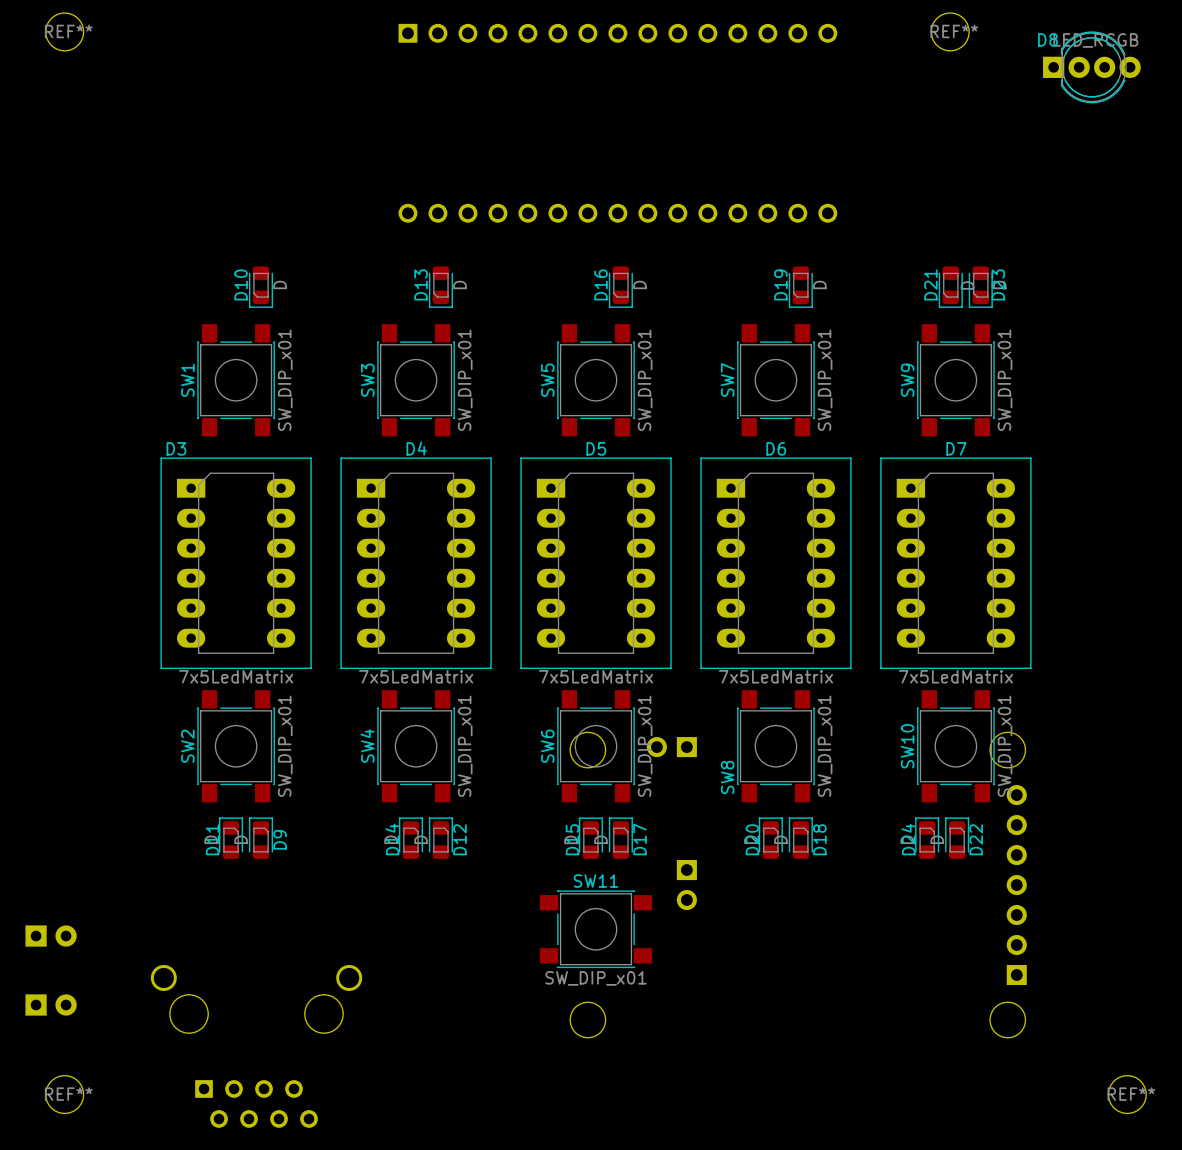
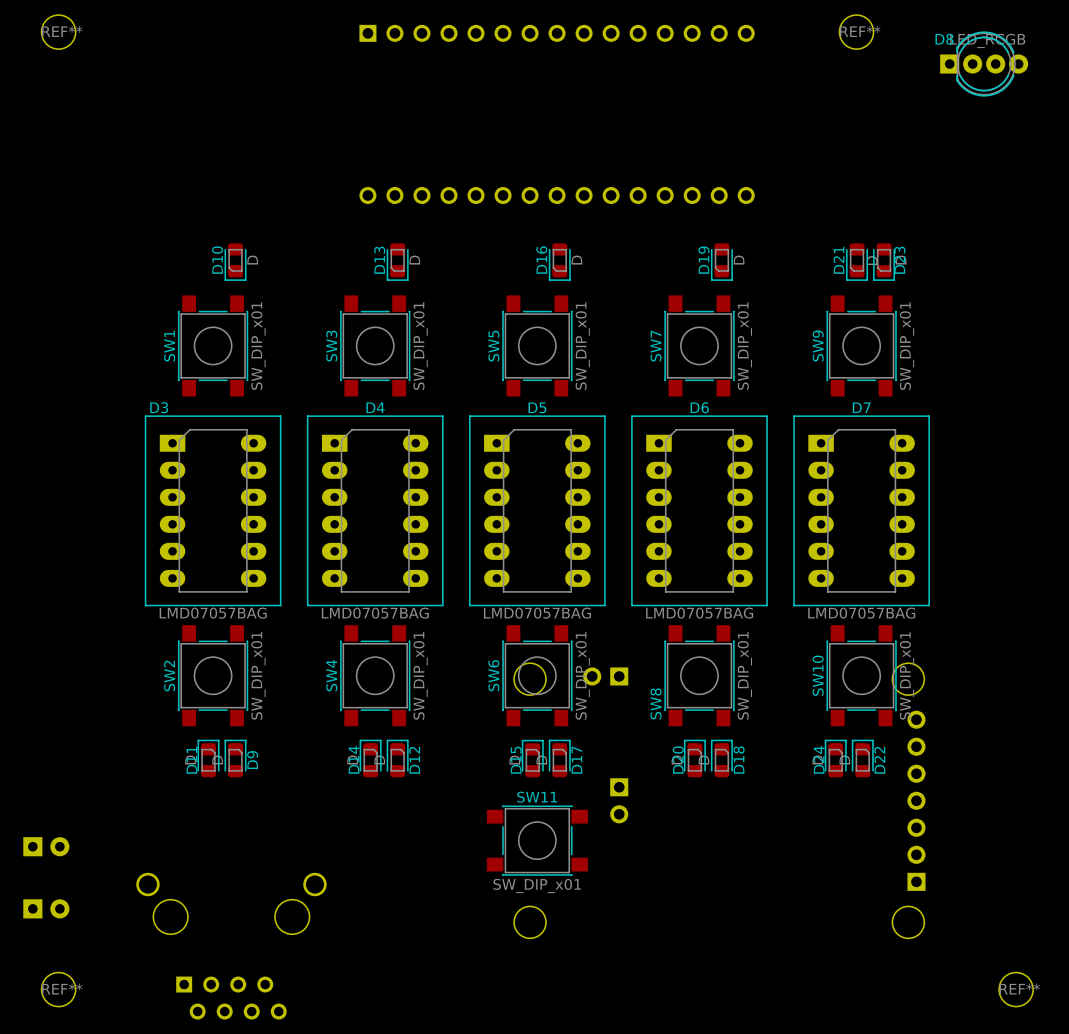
D3 value: 7x5LedMatrix (236, 676) -> LMD07057BAG (213, 613)
D4 value: 7x5LedMatrix (416, 676) -> LMD07057BAG (375, 613)
D5 value: 7x5LedMatrix (596, 676) -> LMD07057BAG (537, 613)
D6 value: 7x5LedMatrix (775, 676) -> LMD07057BAG (699, 613)
D7 value: 7x5LedMatrix (955, 676) -> LMD07057BAG (861, 613)

